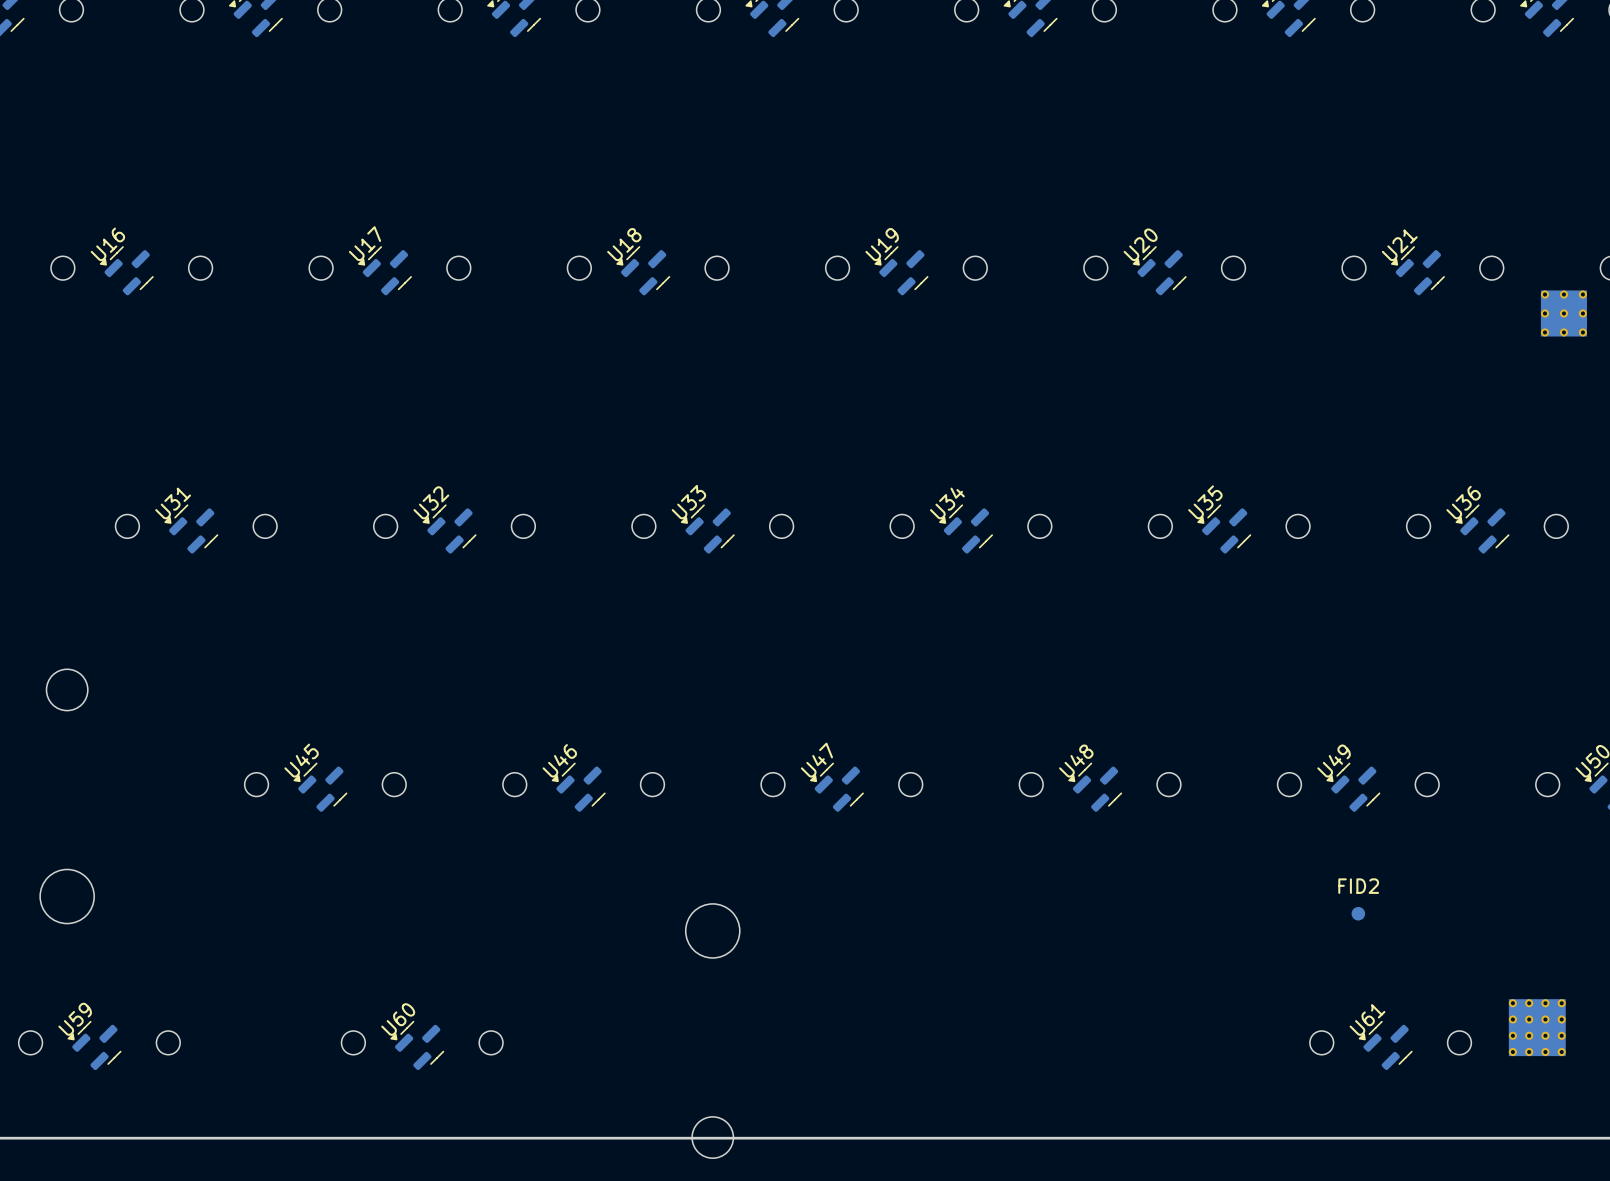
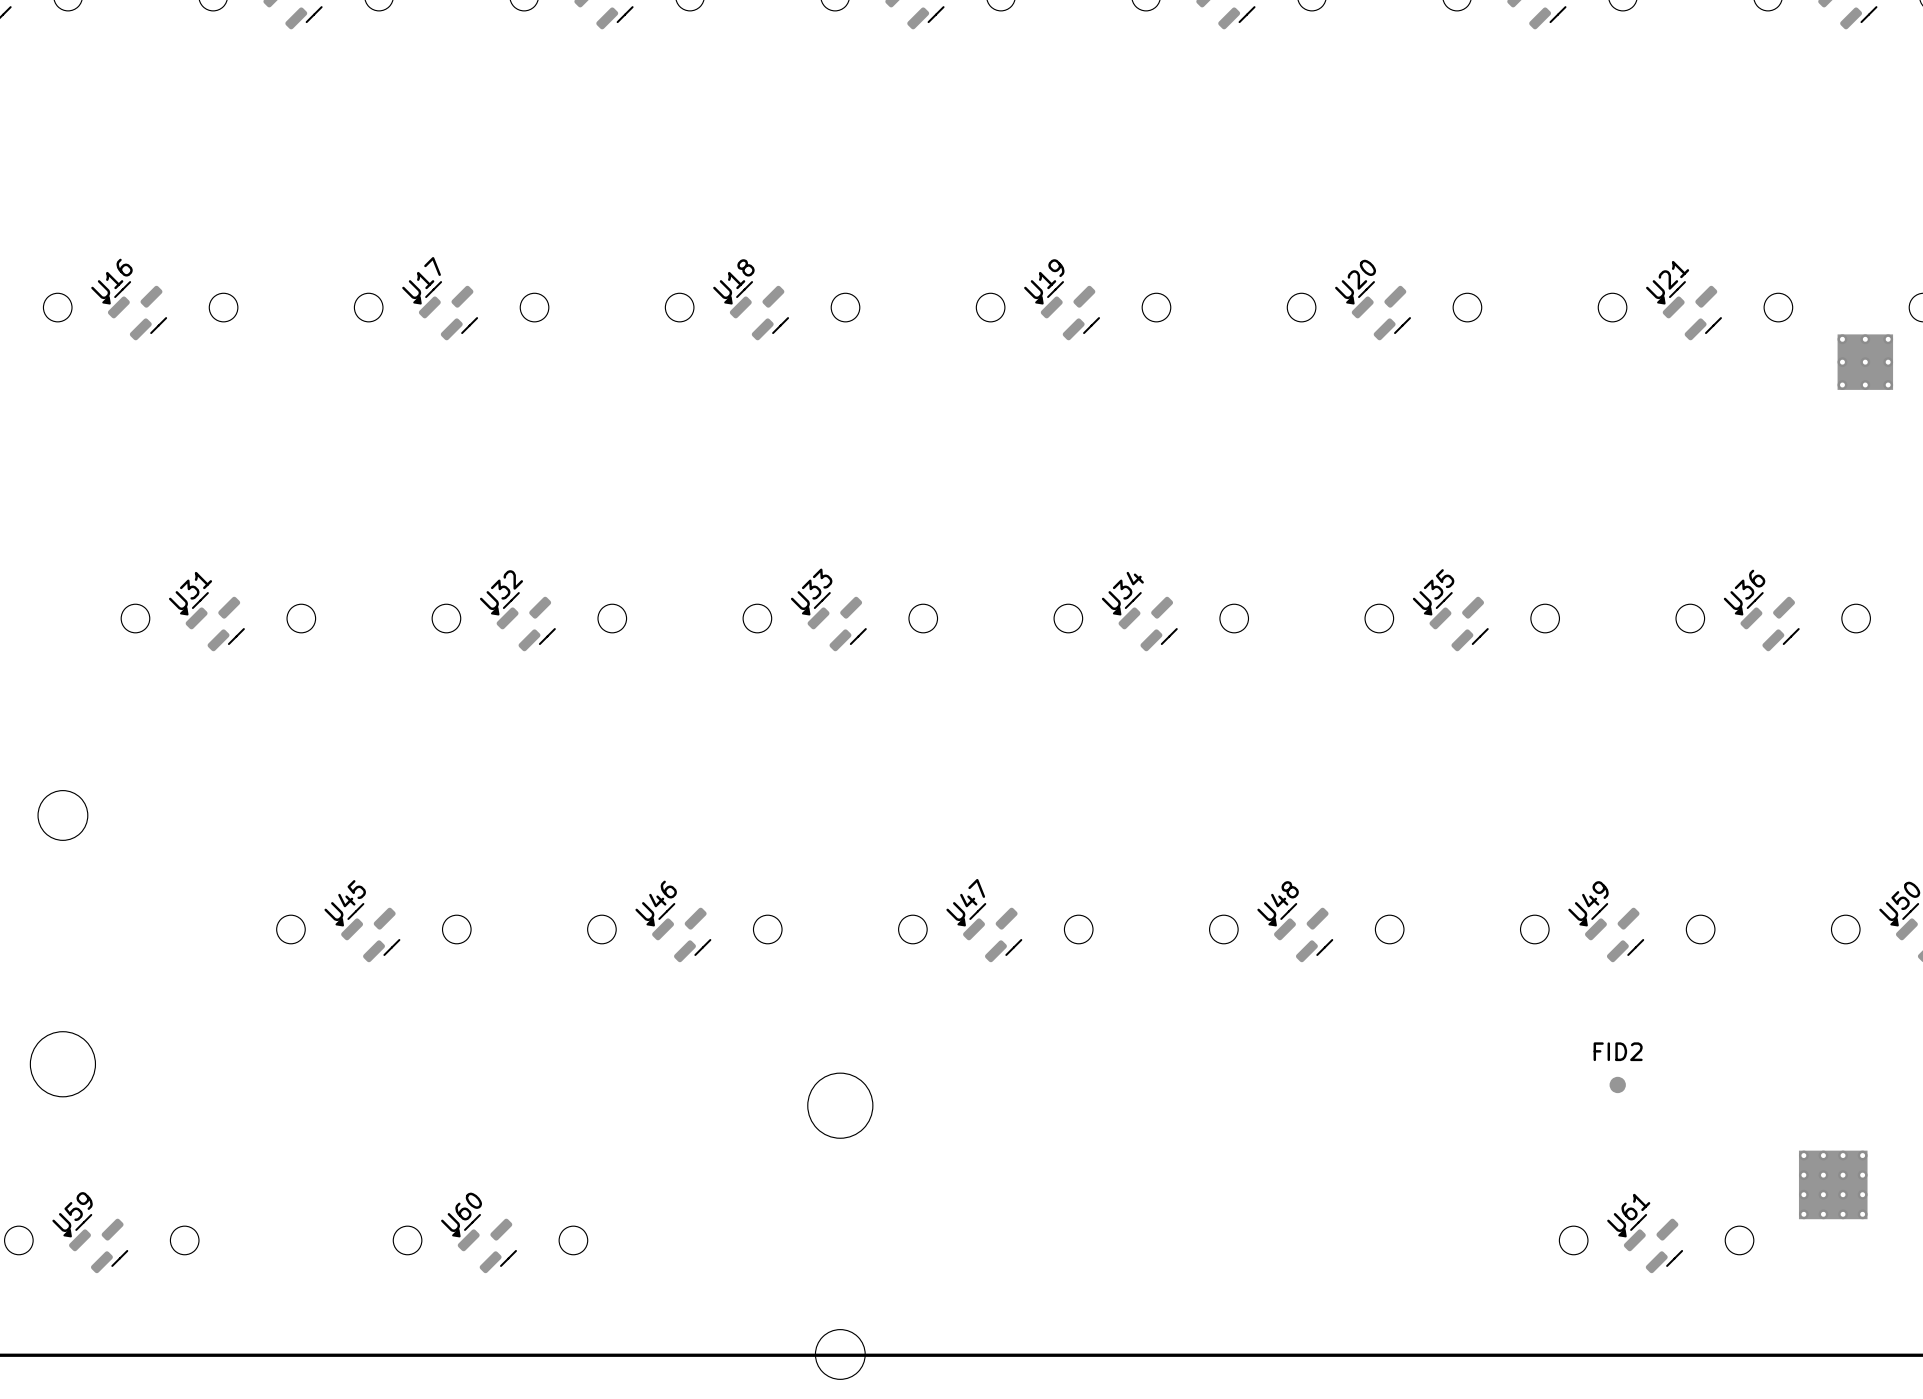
part position: (1537, 1027) -> (1833, 1184)

